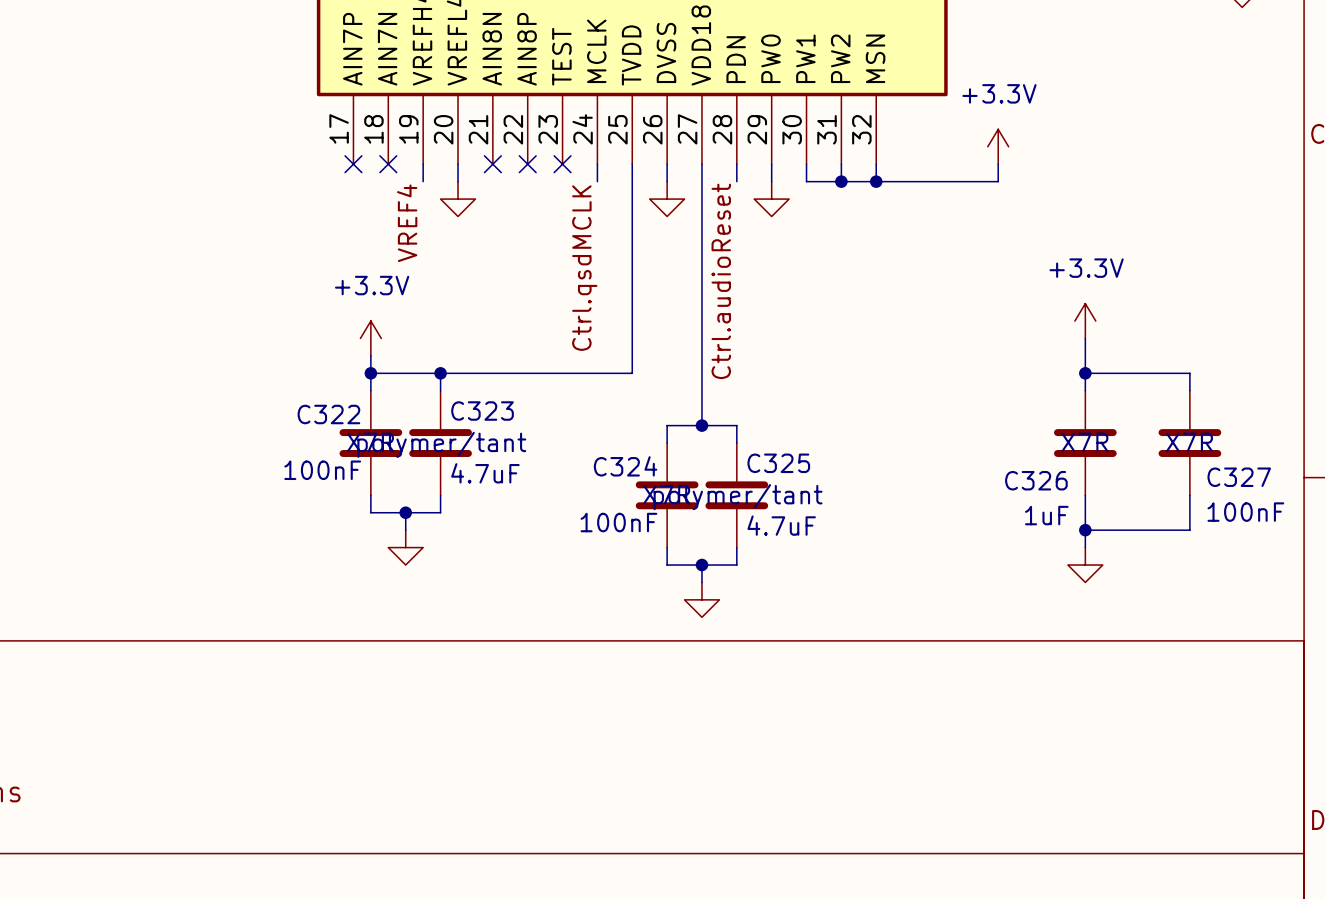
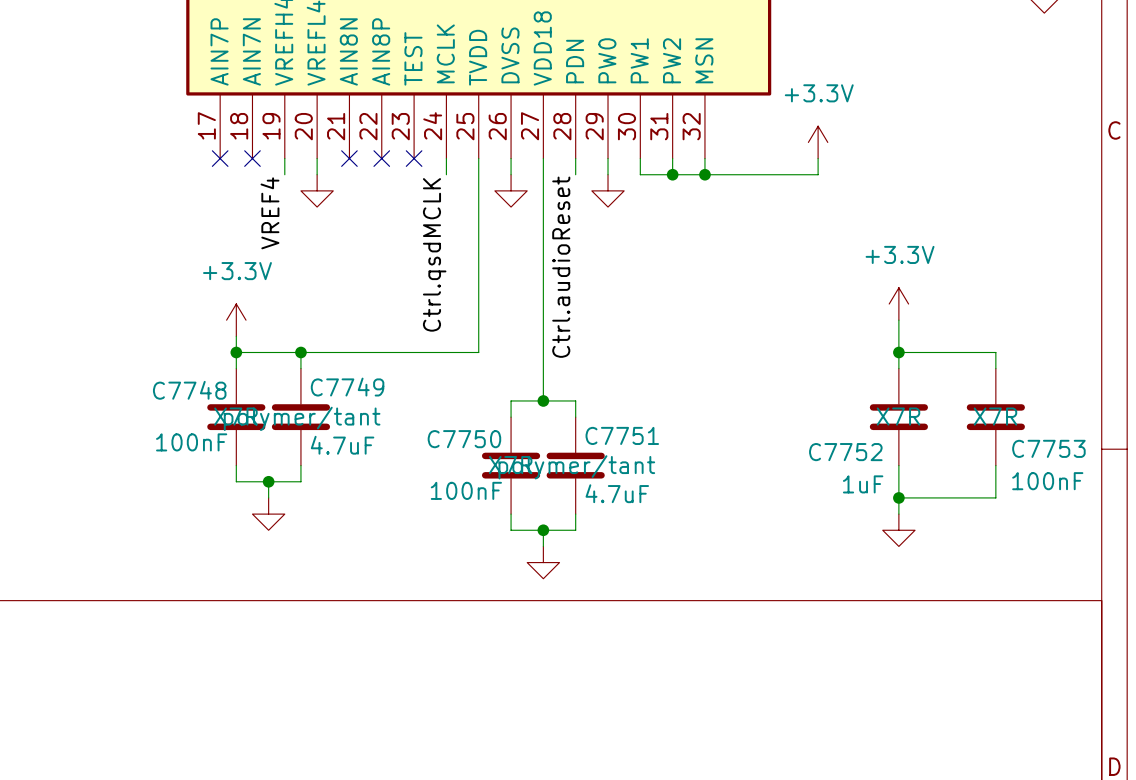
C323 name: C323 (482, 411) -> C7749 (347, 387)
C322 name: C322 (328, 414) -> C7748 (189, 390)
C325 name: C325 (778, 463) -> C7751 (622, 435)
C324 name: C324 (625, 466) -> C7750 (464, 439)
C327 name: C327 (1239, 477) -> C7753 (1048, 448)
C326 name: C326 (1036, 480) -> C7752 (845, 452)

